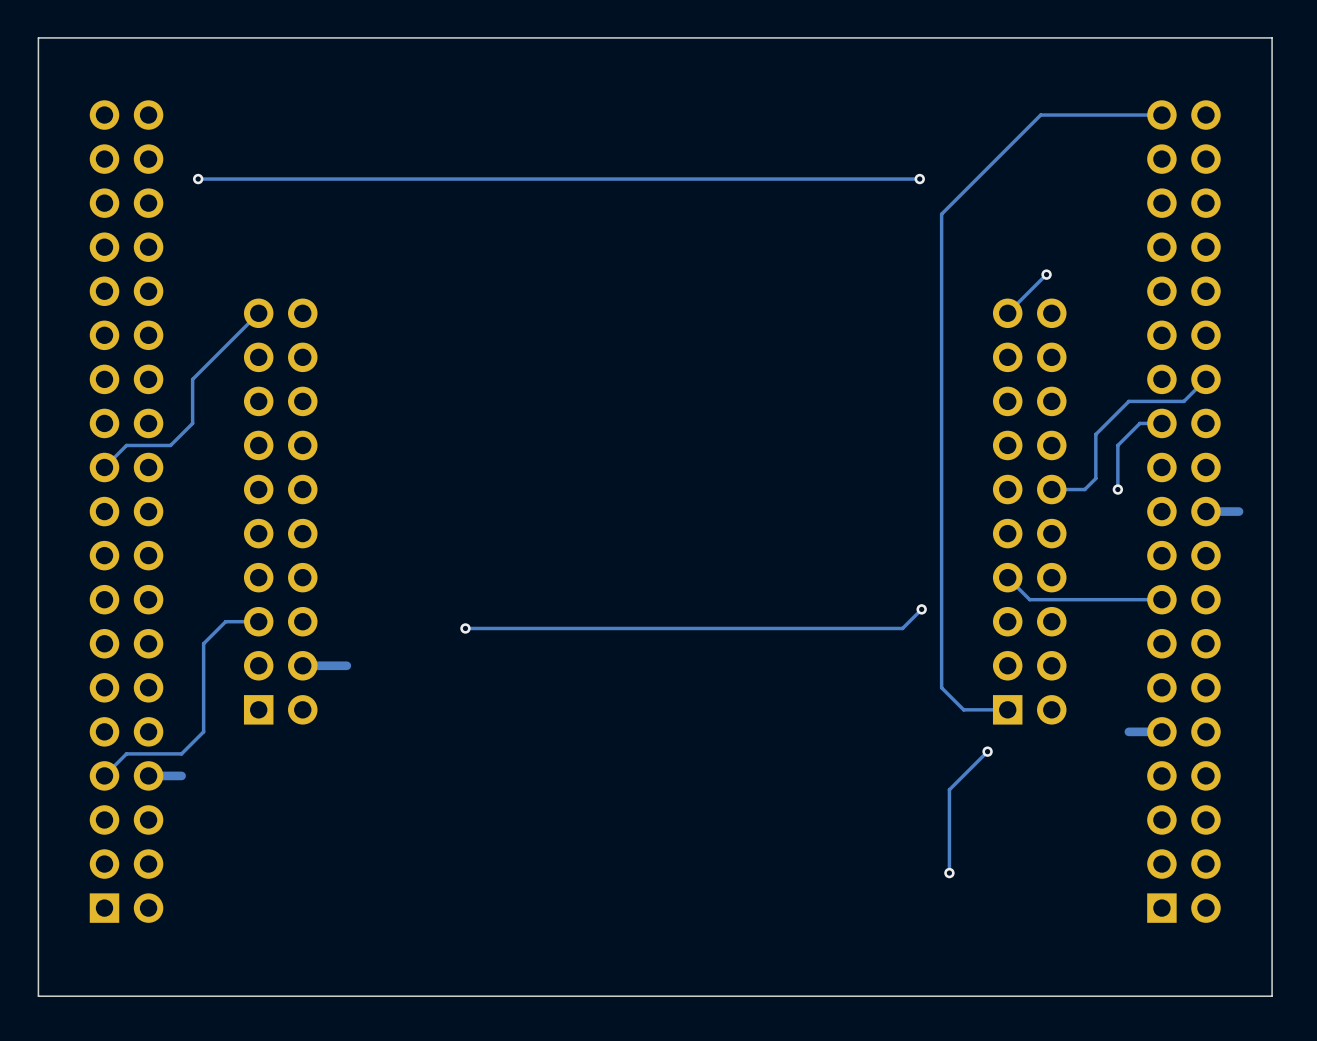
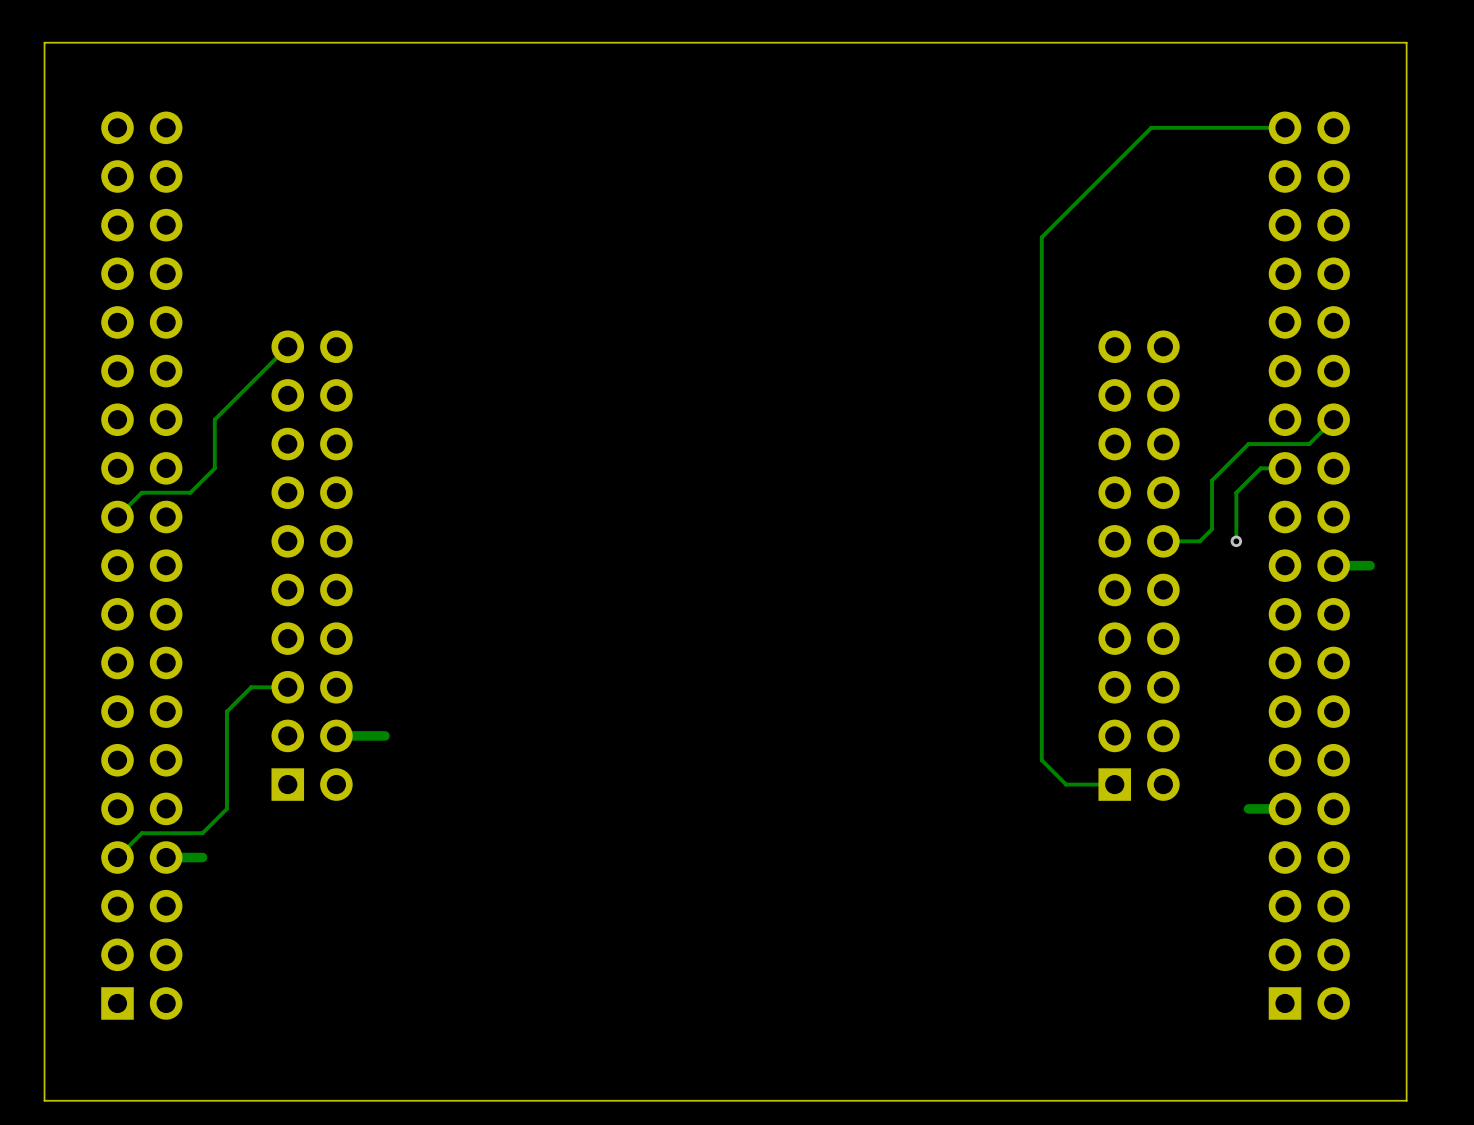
via: (198, 179) -> none
track: (919, 179) (198, 179) -> none
via: (919, 179) -> none
track: (1046, 274) (1007, 313) -> none
via: (1046, 274) -> none
track: (1007, 577) (1029, 599) (1161, 599) -> none
track: (921, 609) (902, 628) (465, 628) -> none
via: (921, 609) -> none
via: (465, 628) -> none
track: (987, 751) (949, 789) (949, 873) -> none
via: (987, 751) -> none
via: (949, 873) -> none

